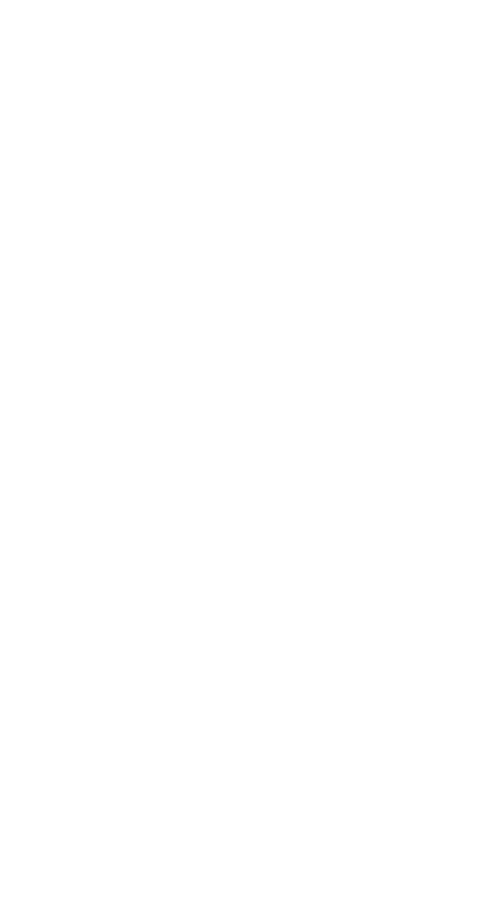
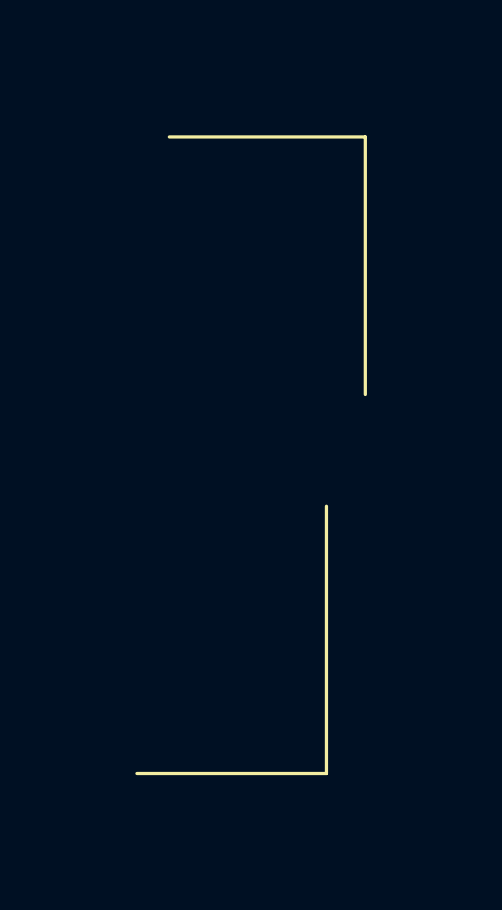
line: none -> (169, 136) (365, 136) (365, 394)
line: none -> (326, 506) (326, 773) (136, 773)

